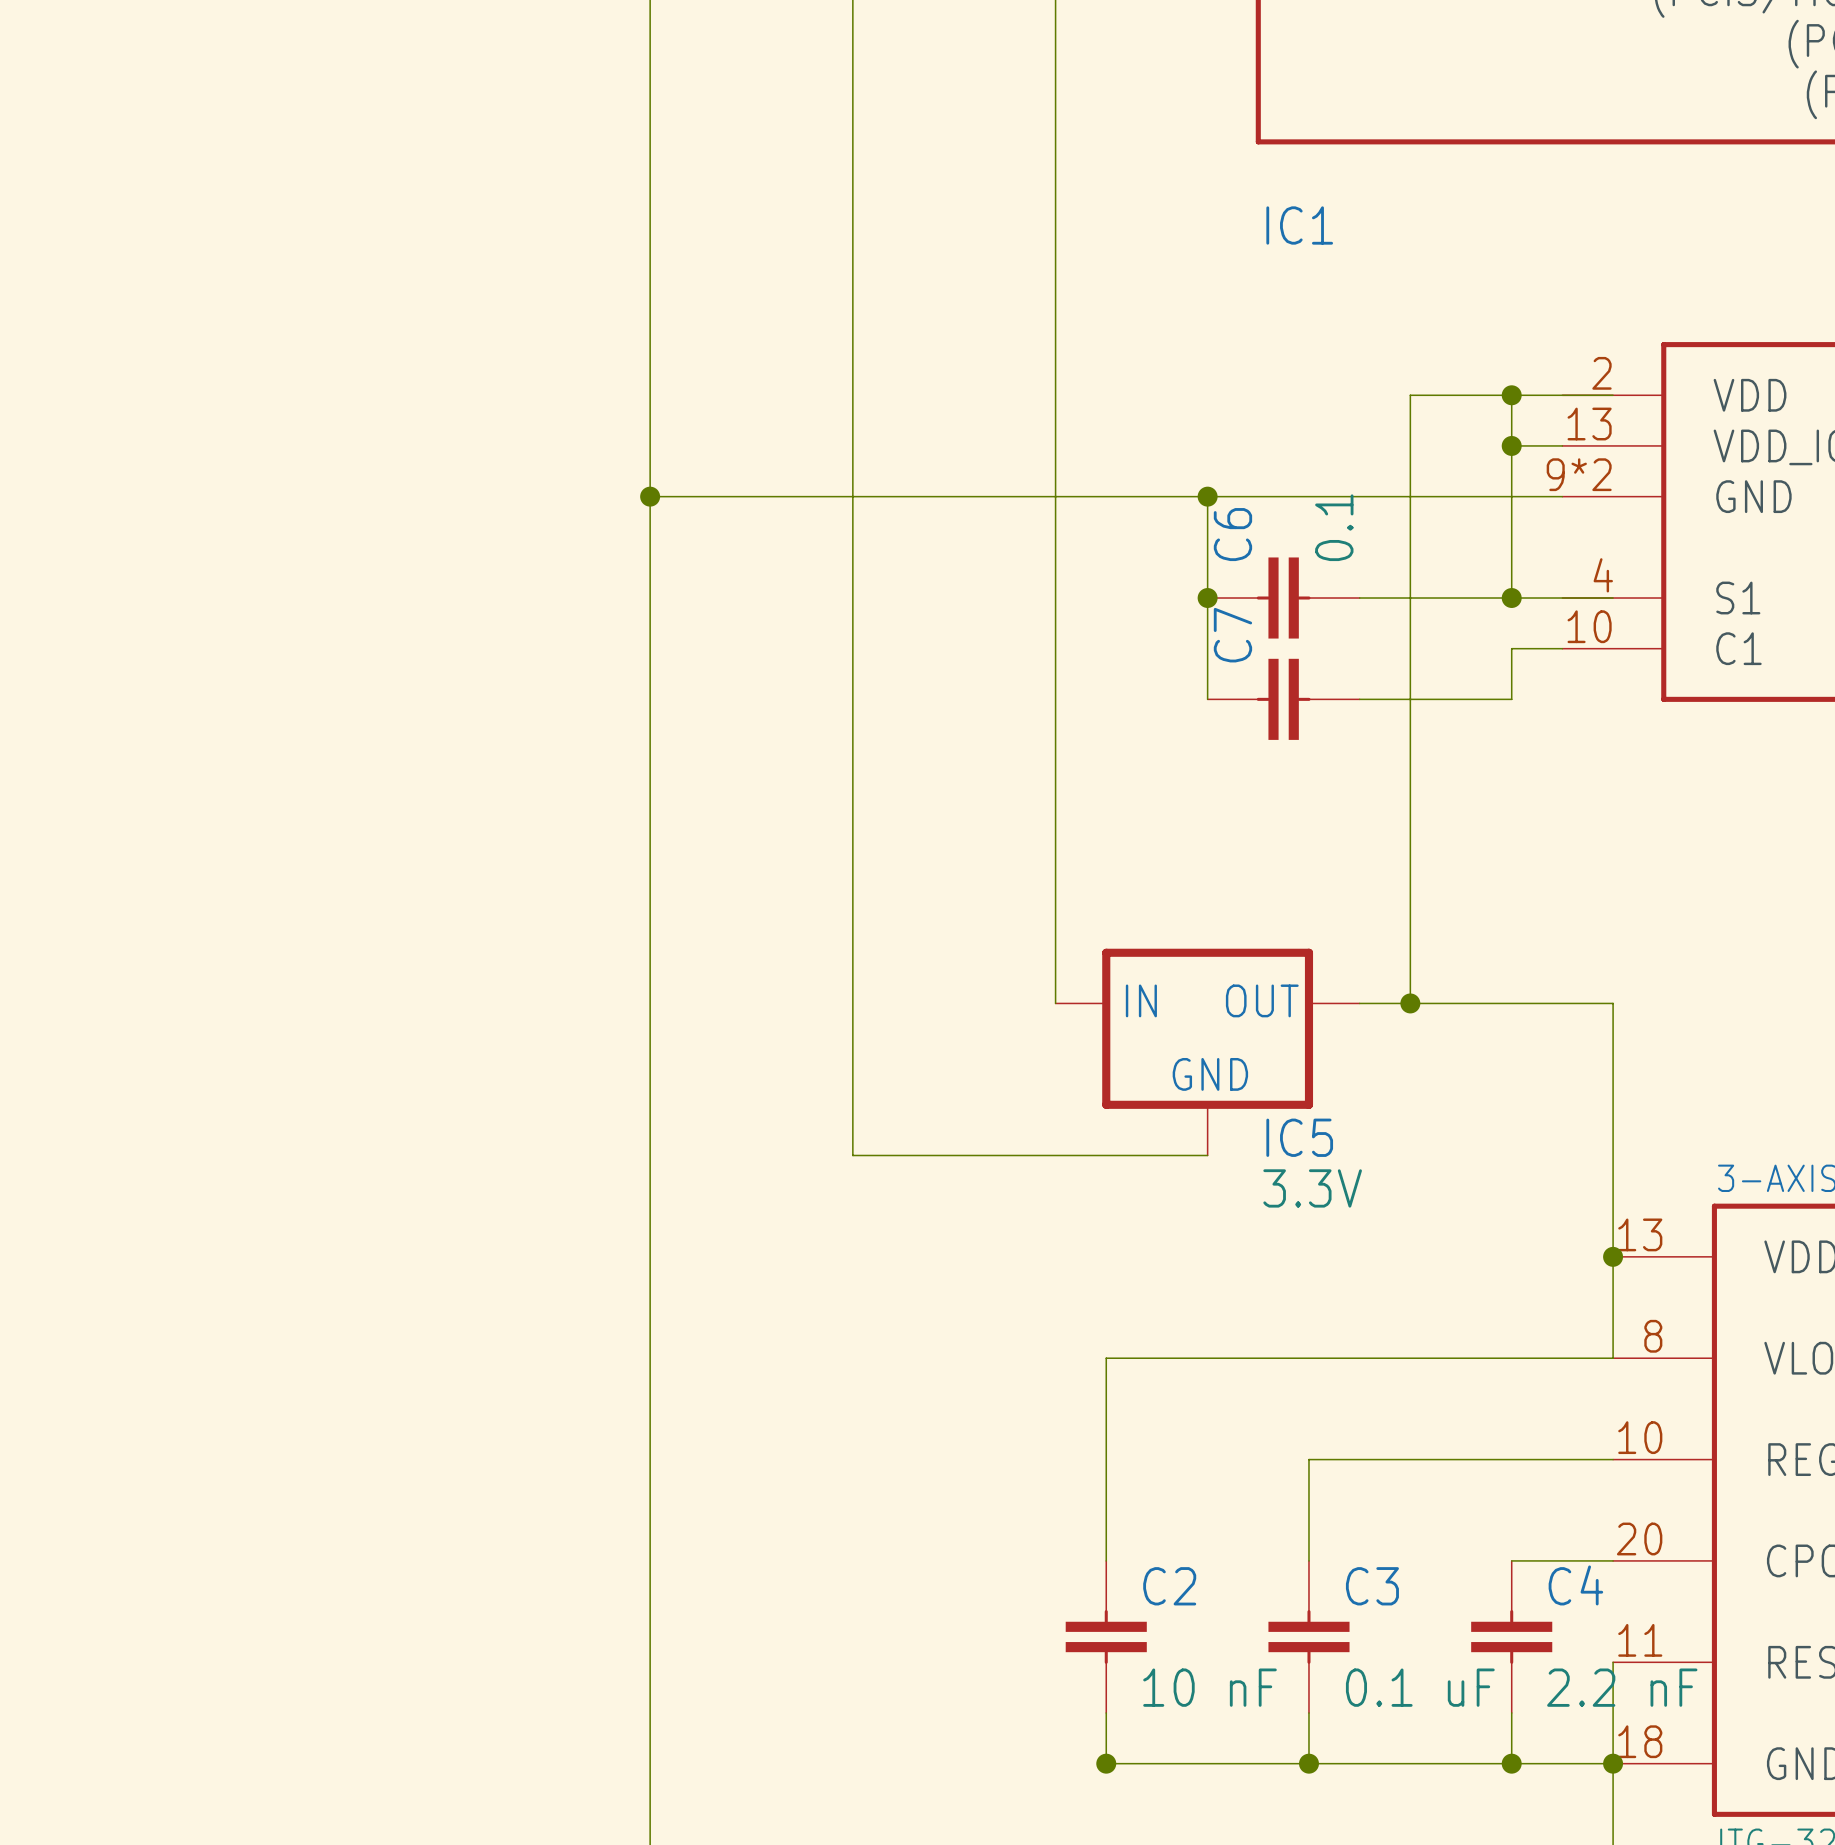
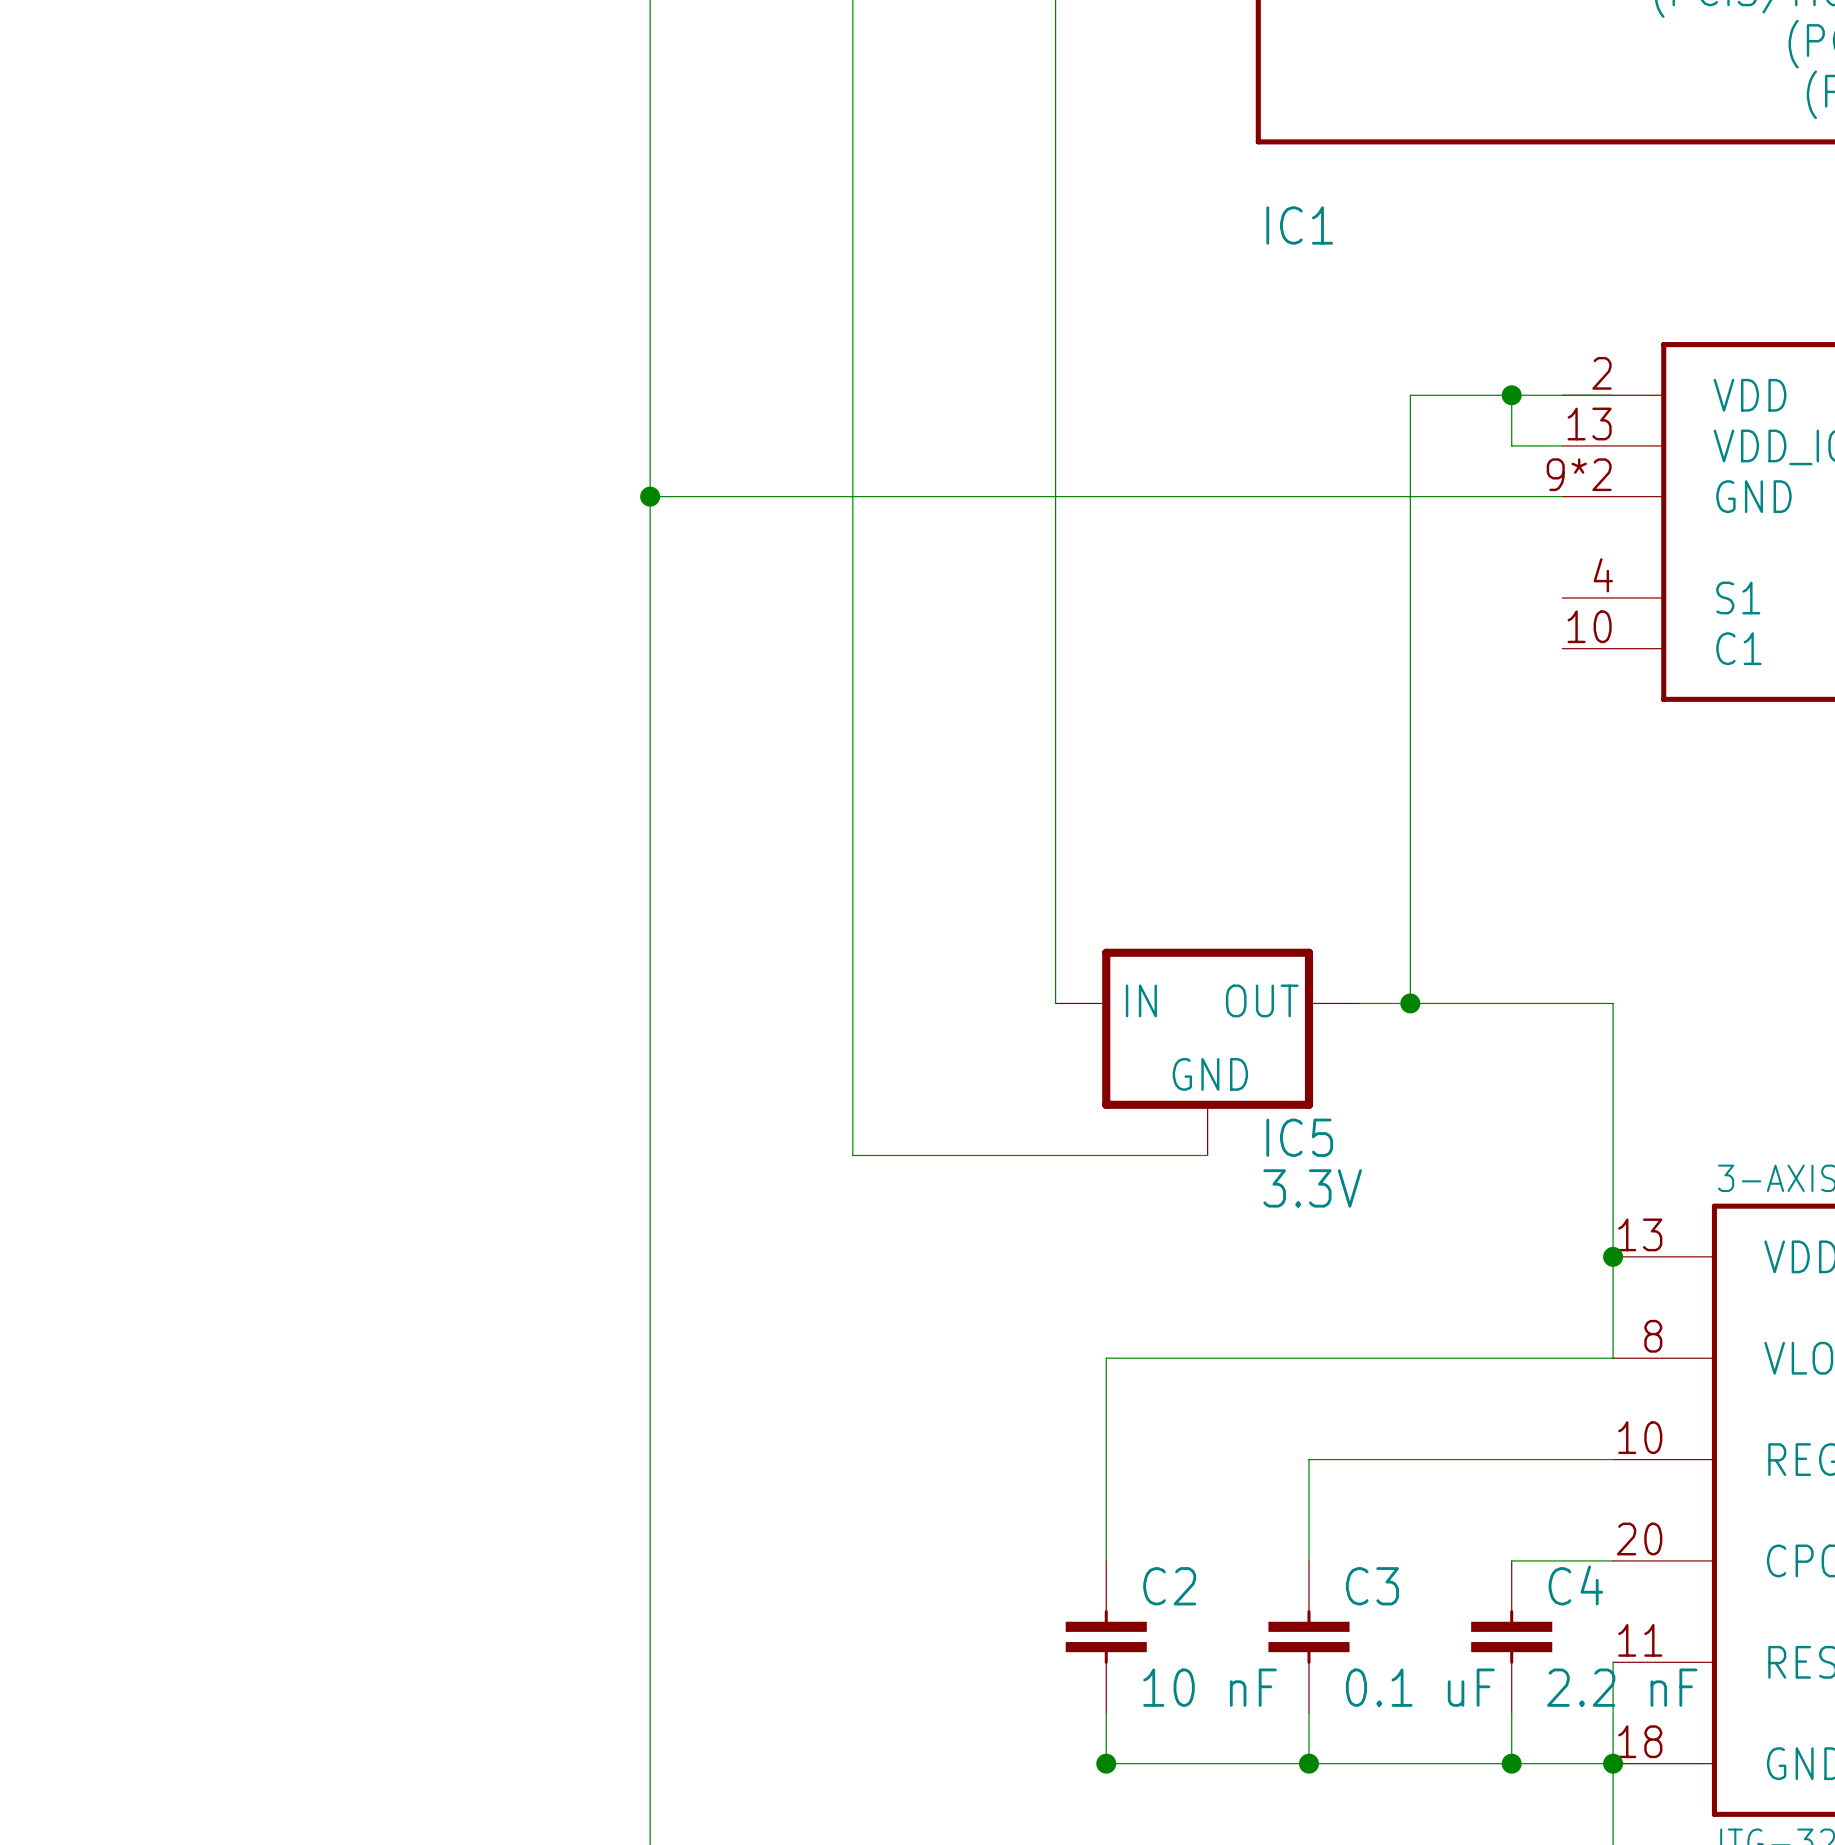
wire: (1511, 445) (1511, 598) -> none
junction: (1511, 445) -> none
wire: (1207, 496) (1207, 699) -> none
junction: (1207, 496) -> none
junction: (1207, 598) -> none
C6: 0.1 (1283, 598) -> none
wire: (1359, 598) (1613, 598) -> none
junction: (1511, 598) -> none
wire: (1562, 648) (1511, 648) (1511, 699) (1359, 699) -> none
C7: (1283, 699) -> none

